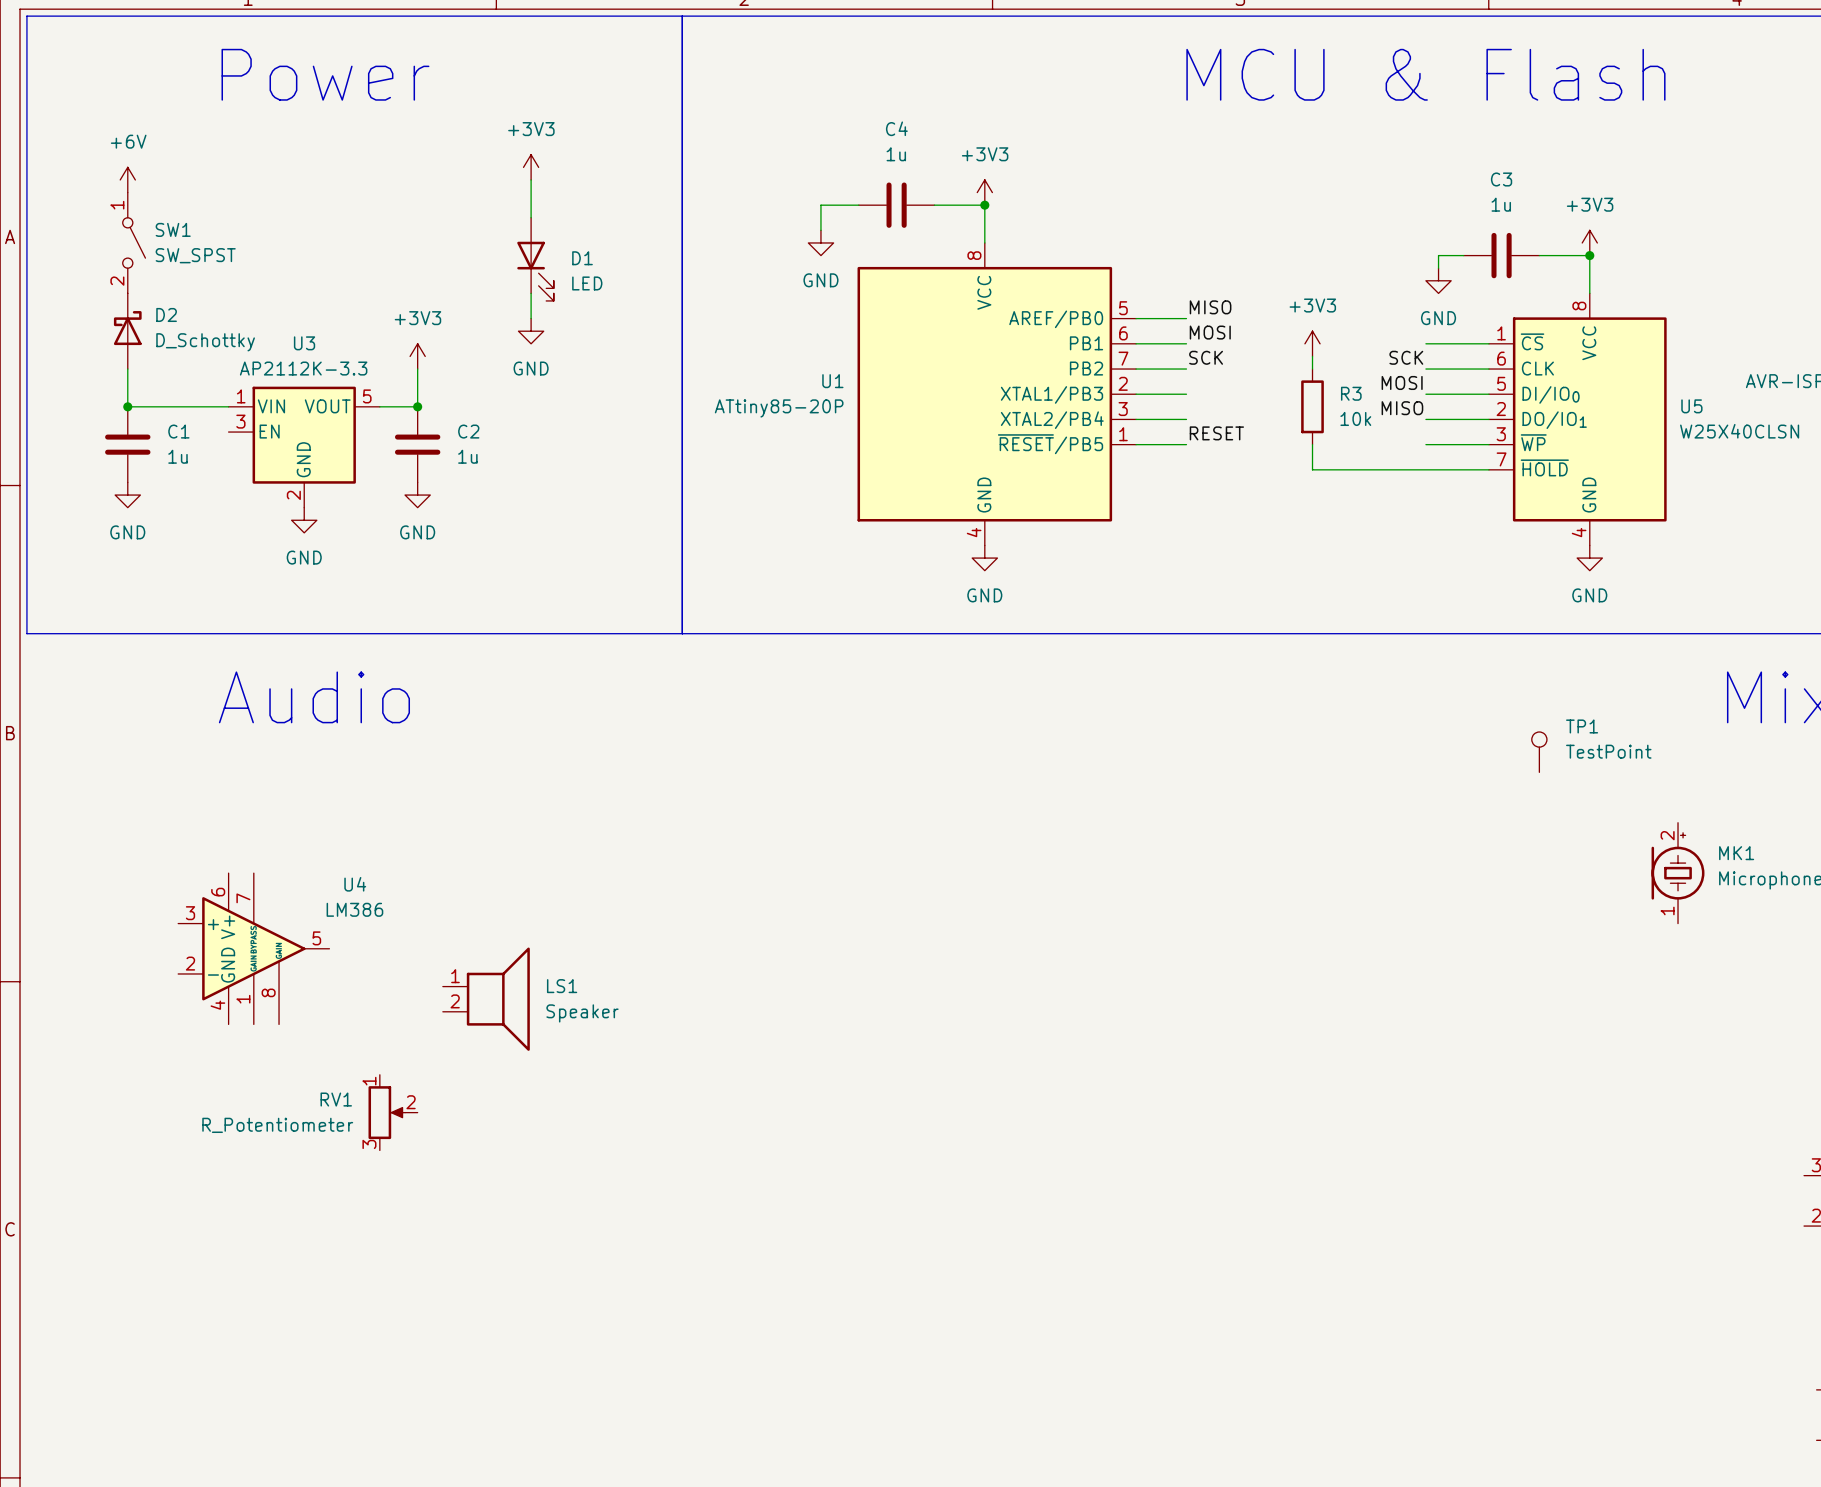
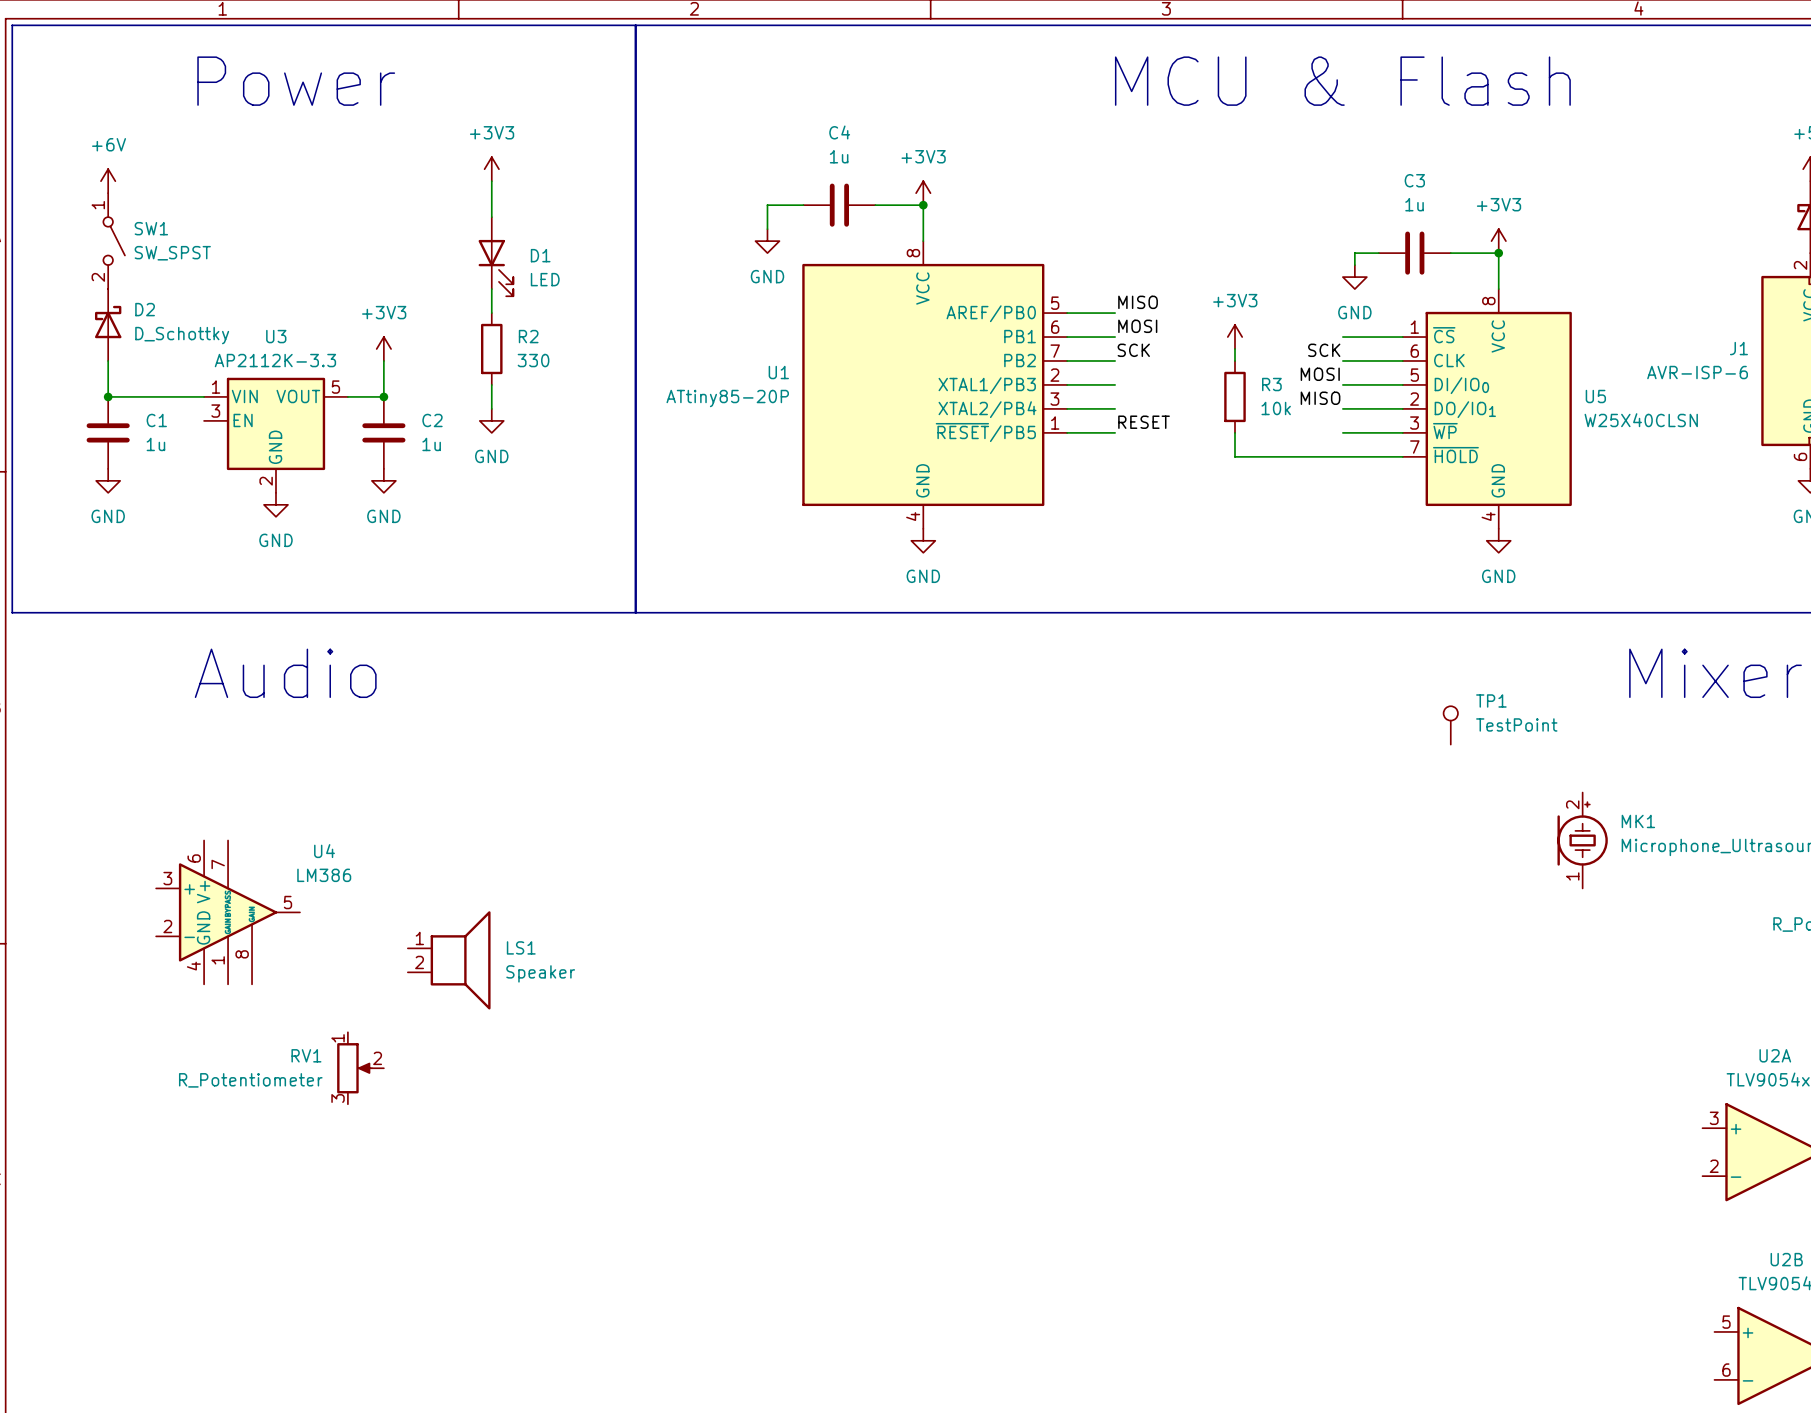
power symbol position: GND (531, 331) -> GND (491, 420)
R2: none -> 330 (491, 349)
wire: none -> (491, 384) (491, 408)

